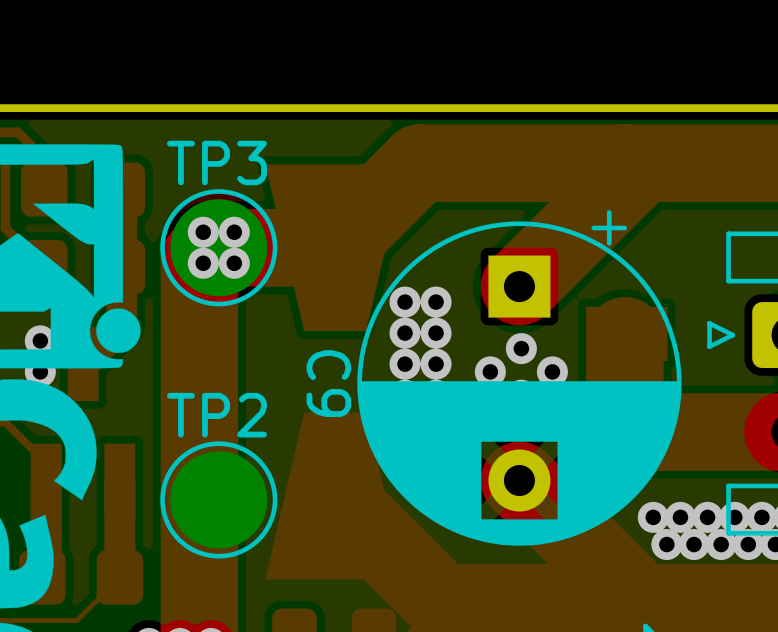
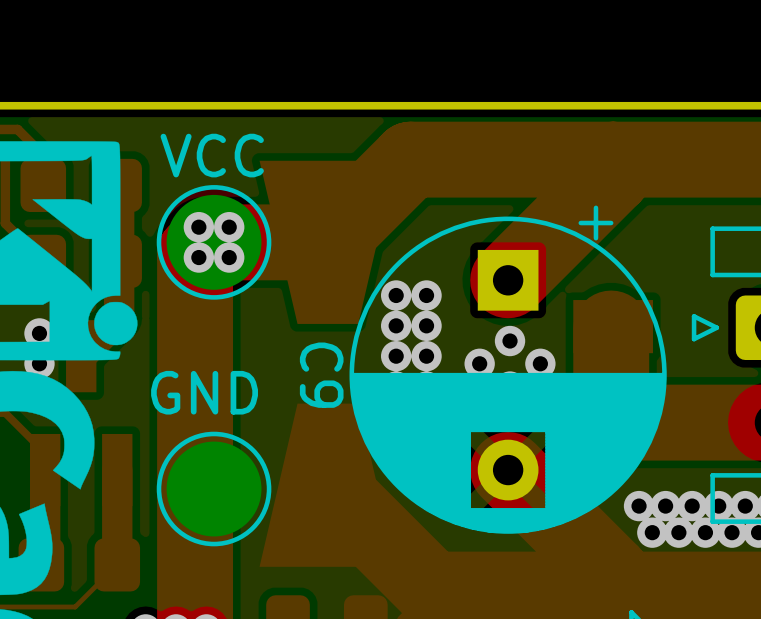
TP3 value: none -> VCC (212, 155)
TP3 name: TP3 (216, 162) -> none
TP2 value: none -> GND (204, 392)
TP2 name: TP2 (216, 415) -> none

